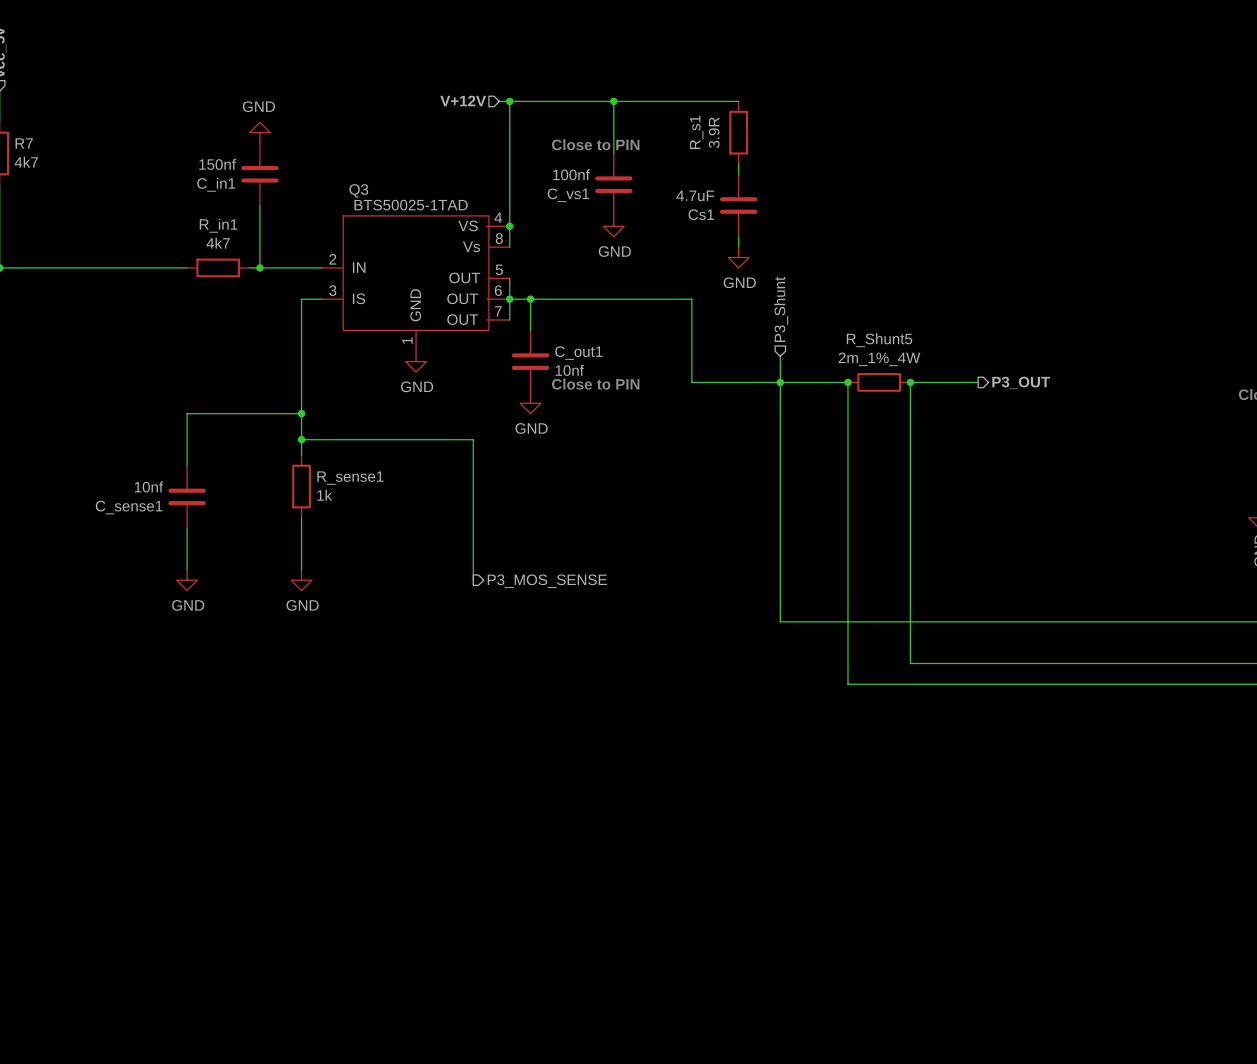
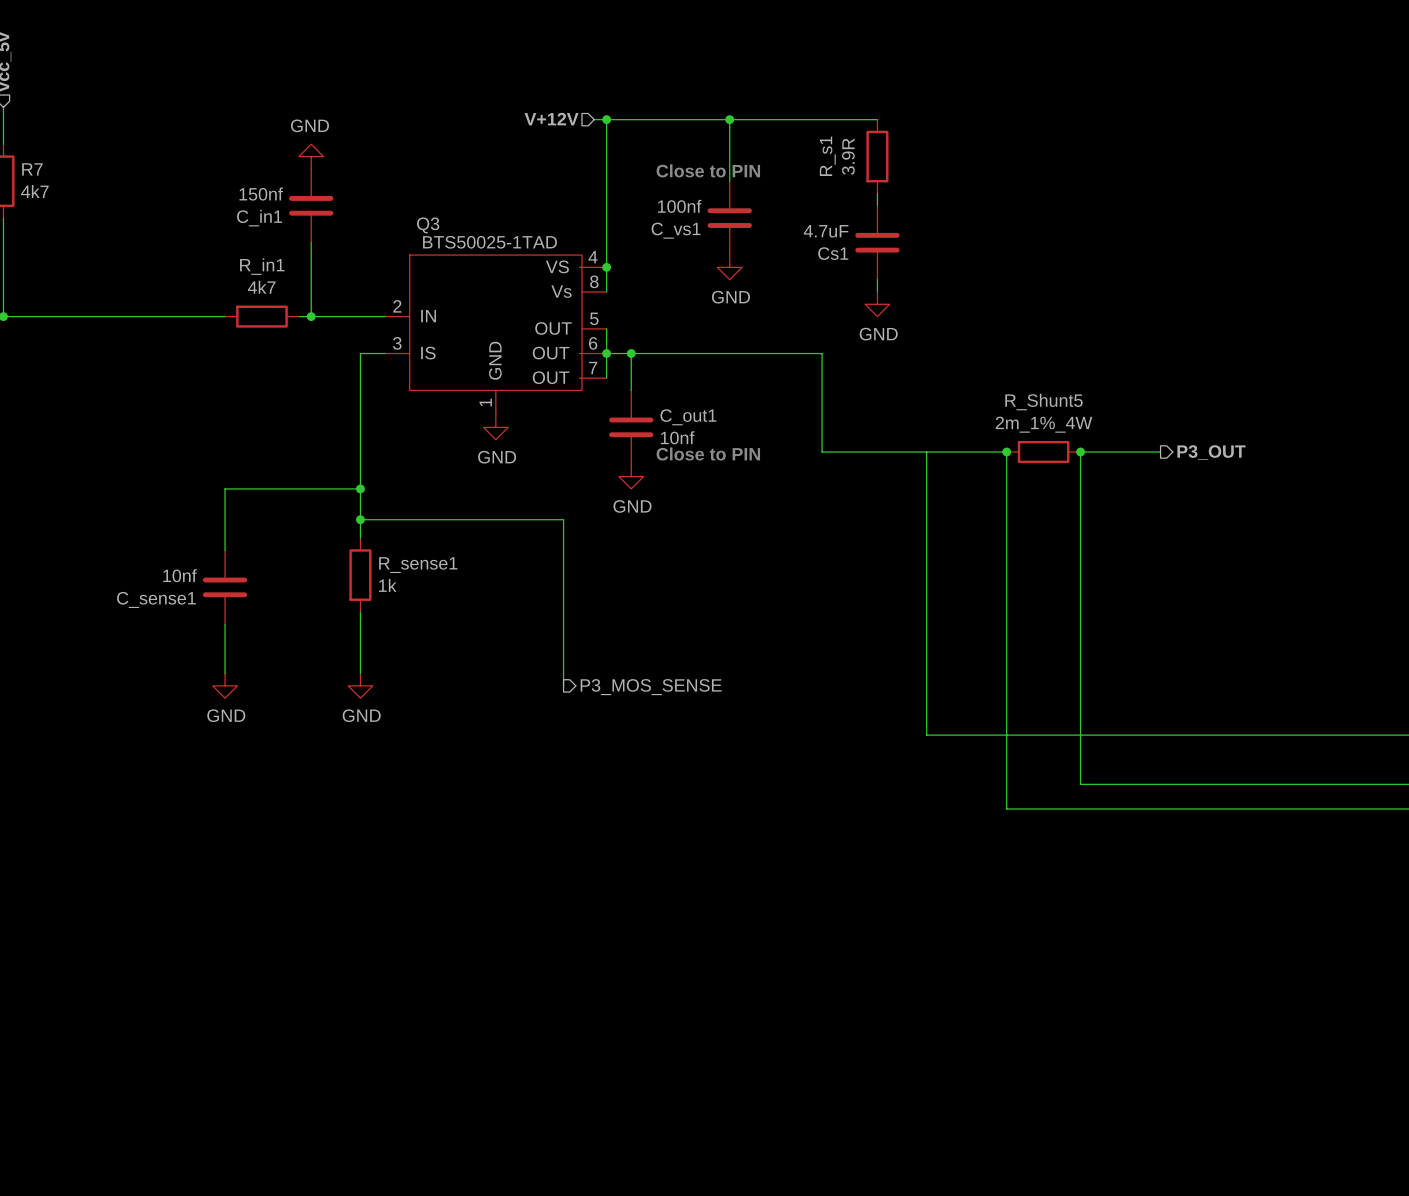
hierarchical label: P3_Shunt (781, 309) -> none
wire: (780, 356) (780, 382) -> none
junction: (780, 382) -> none

